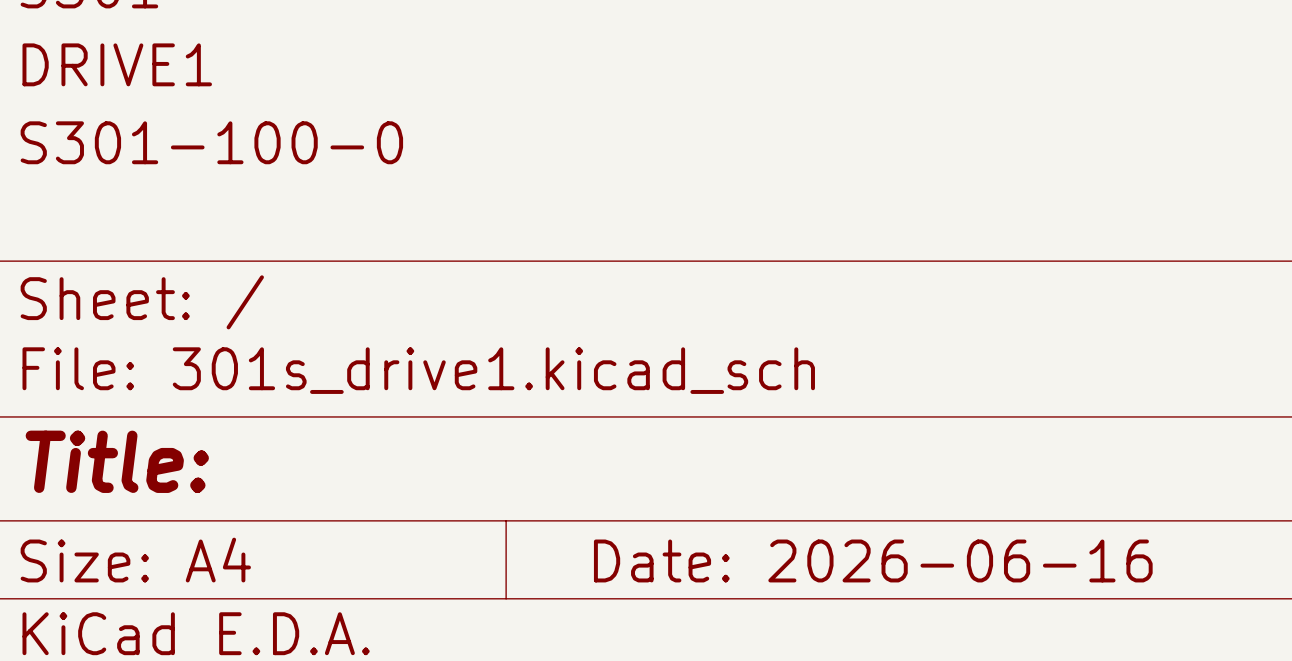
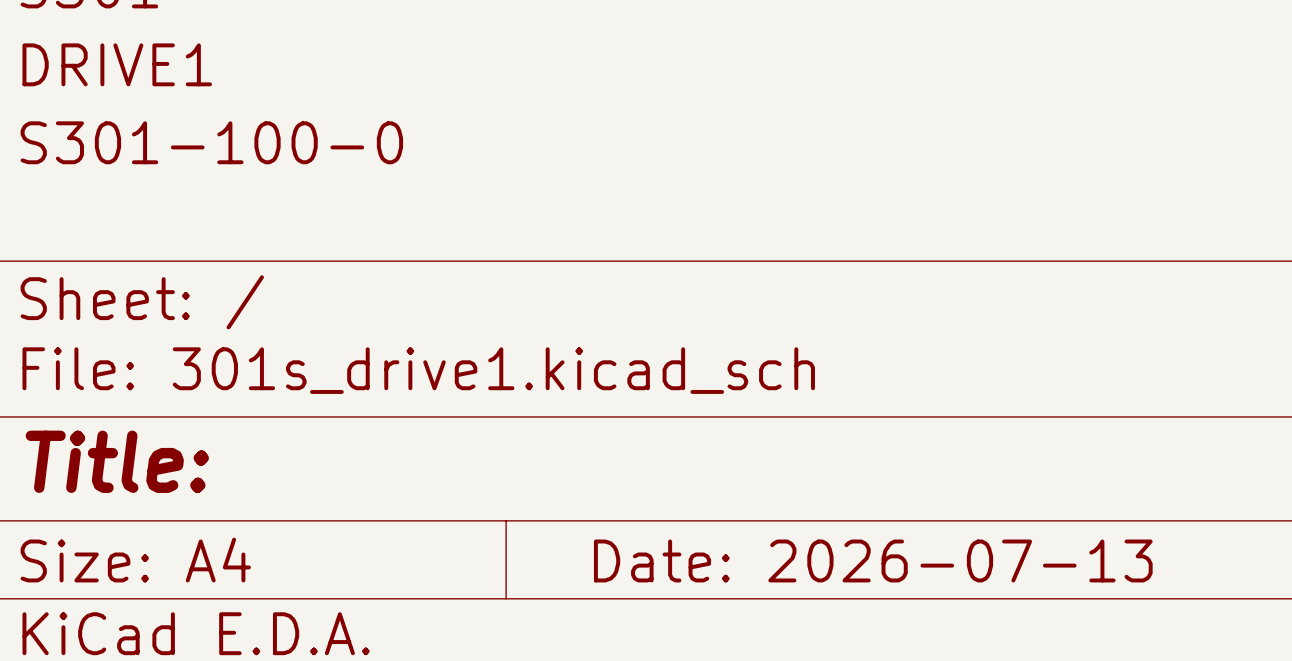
title block: Date: 2026-06-16 (873, 560) -> Date: 2026-07-13 (873, 560)

